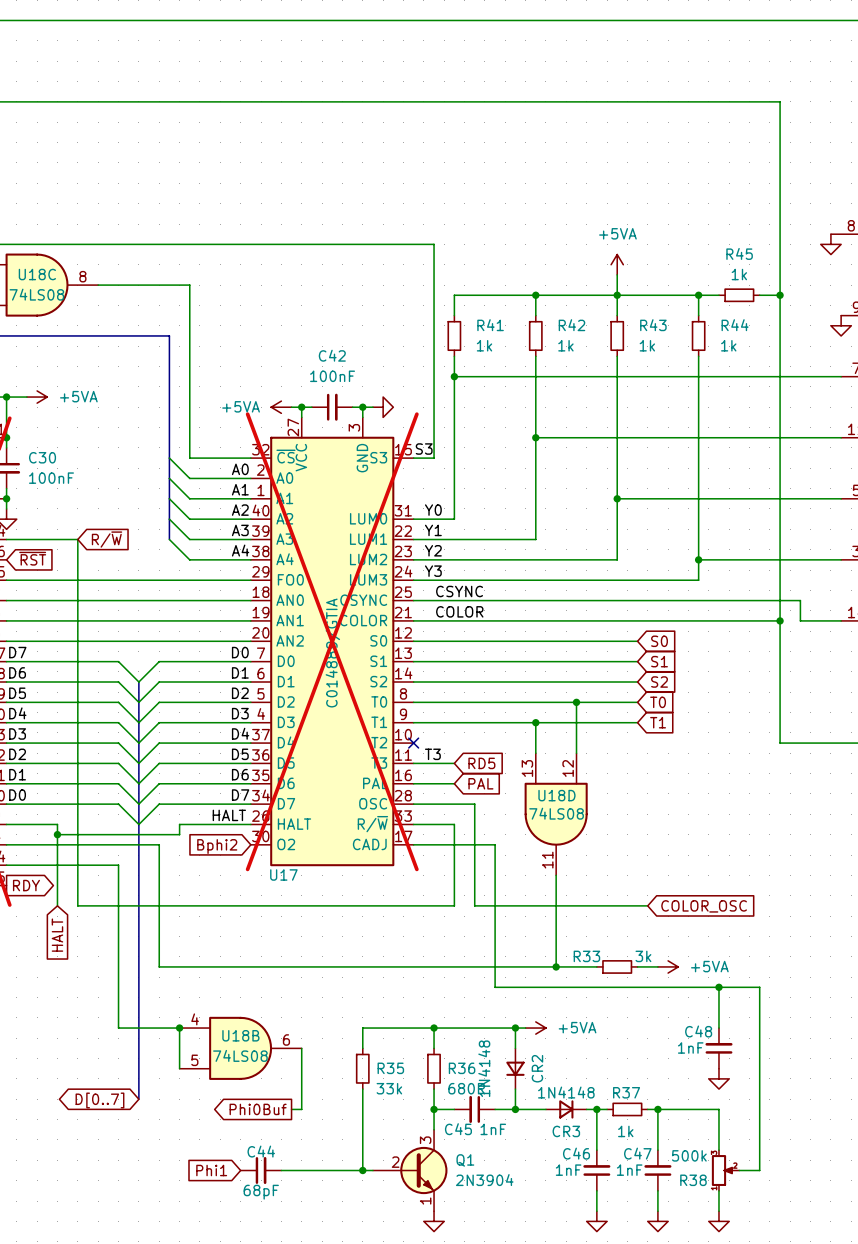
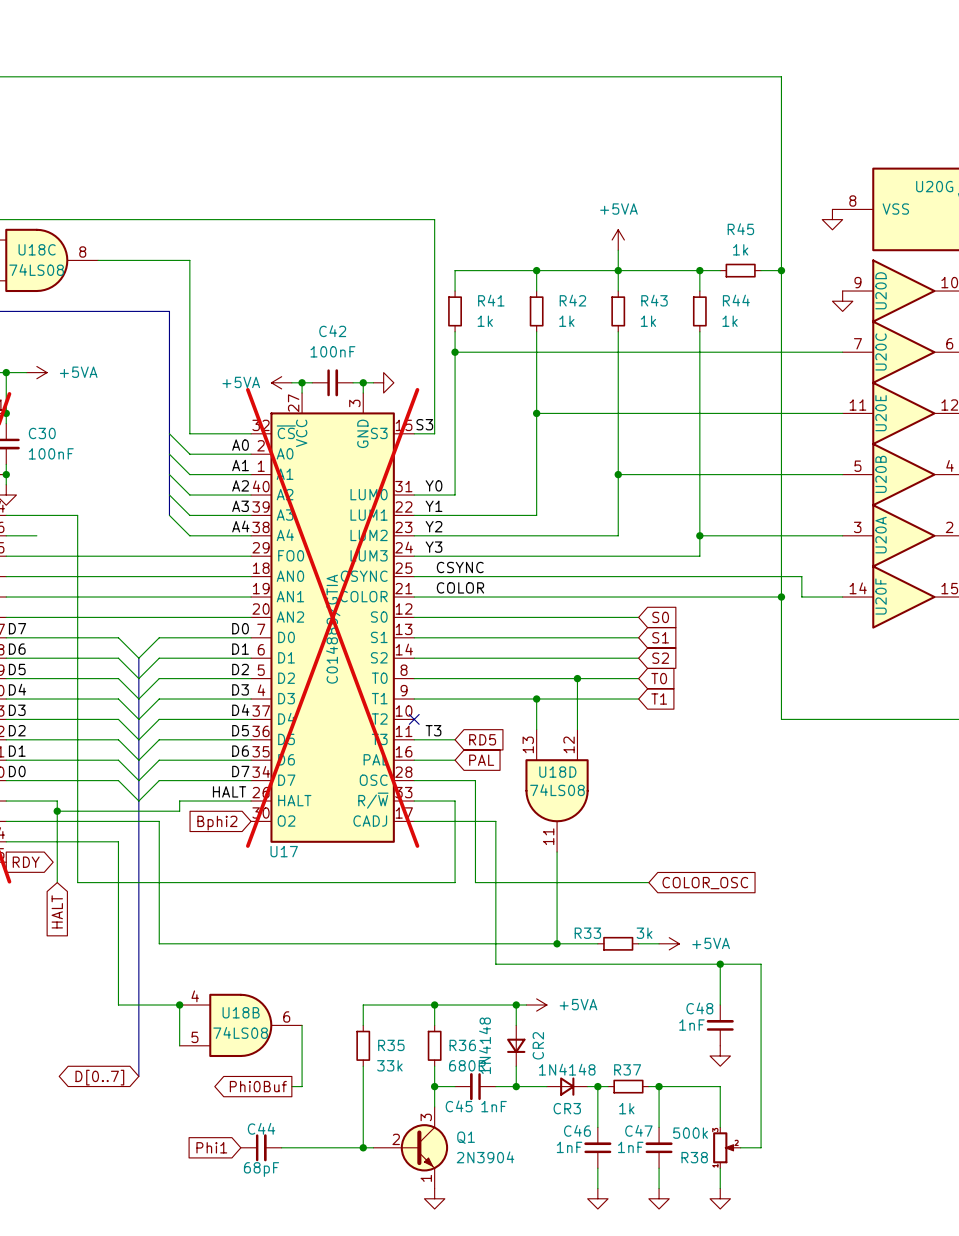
global label: R/~{W} (107, 539) -> none
global label: ~{RST} (32, 558) -> none
wire: none -> (6, 535) (36, 535)

